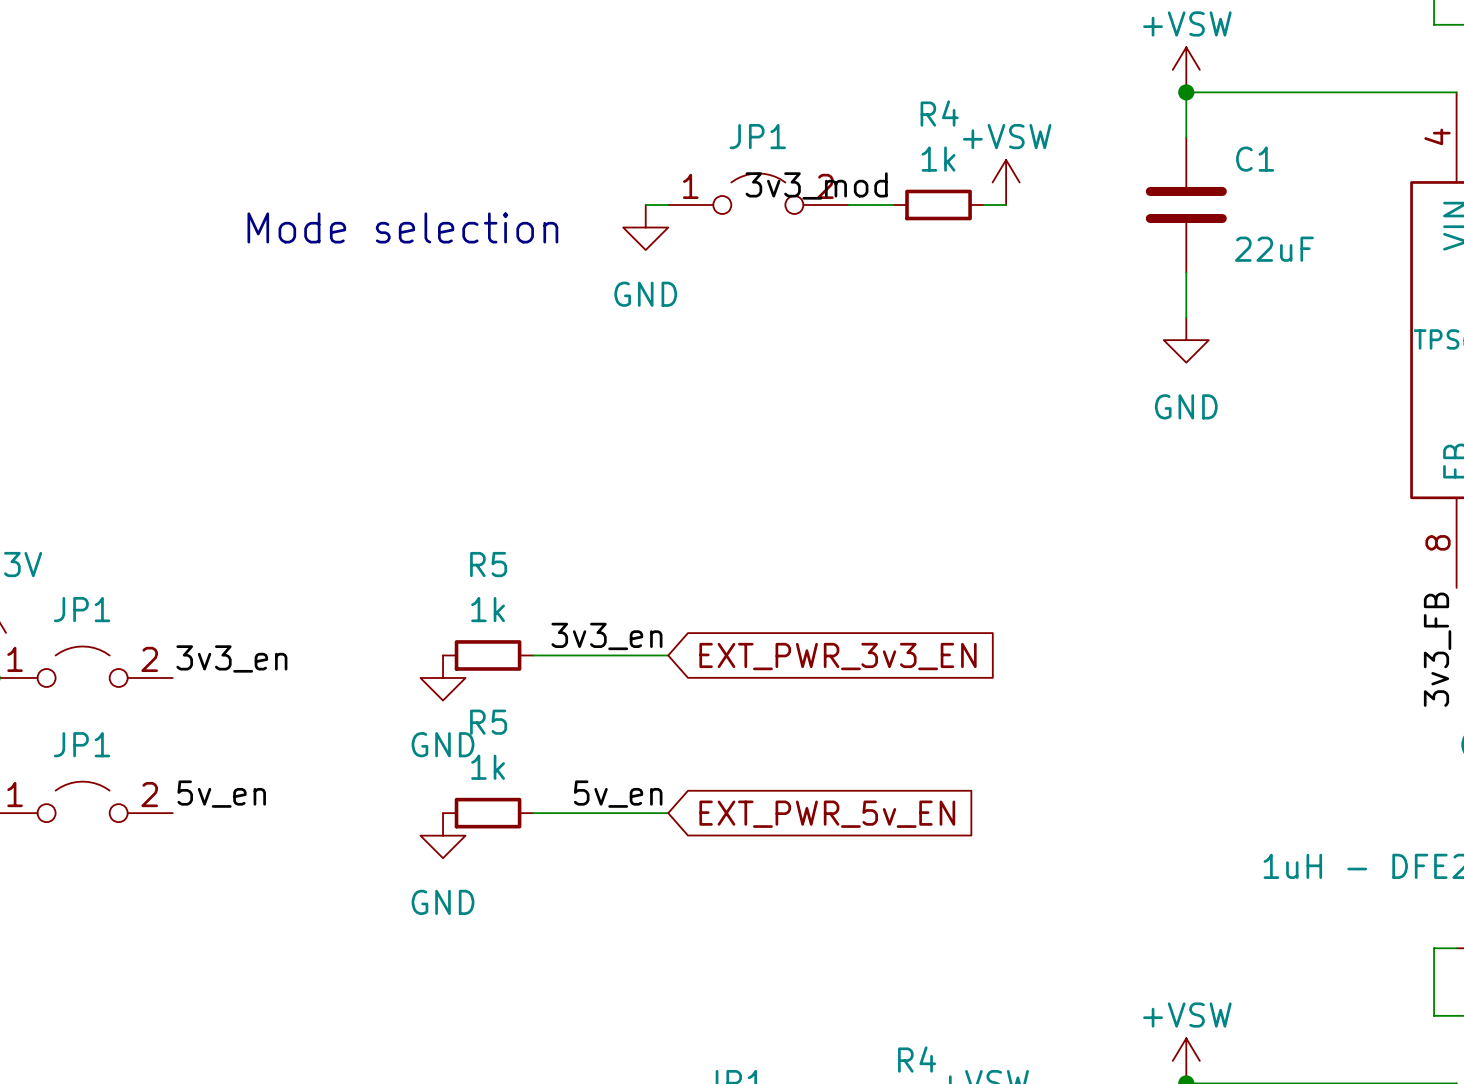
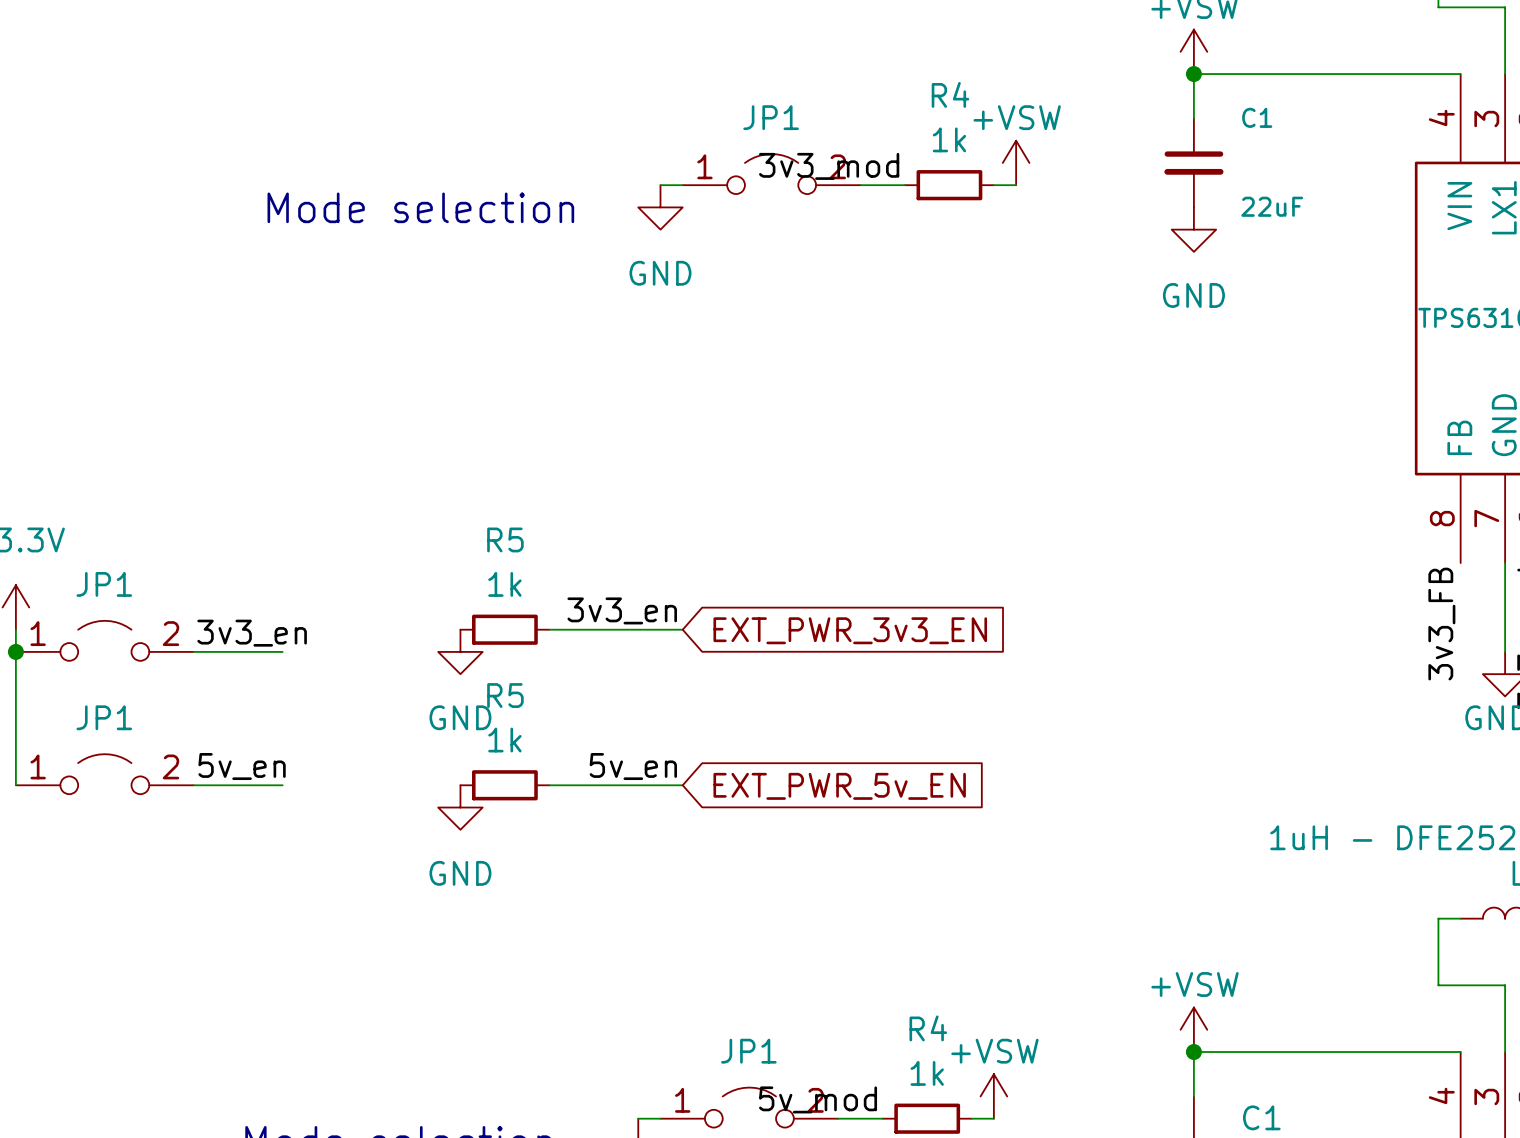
C1: none -> 22uF (1193, 162)
C1: 22uF (1186, 204) -> none
wire: (1186, 272) (1186, 317) -> none
power symbol position: GND (1186, 340) -> GND (1193, 229)
wire: none -> (193, 651) (282, 651)
wire: none -> (193, 785) (282, 785)

